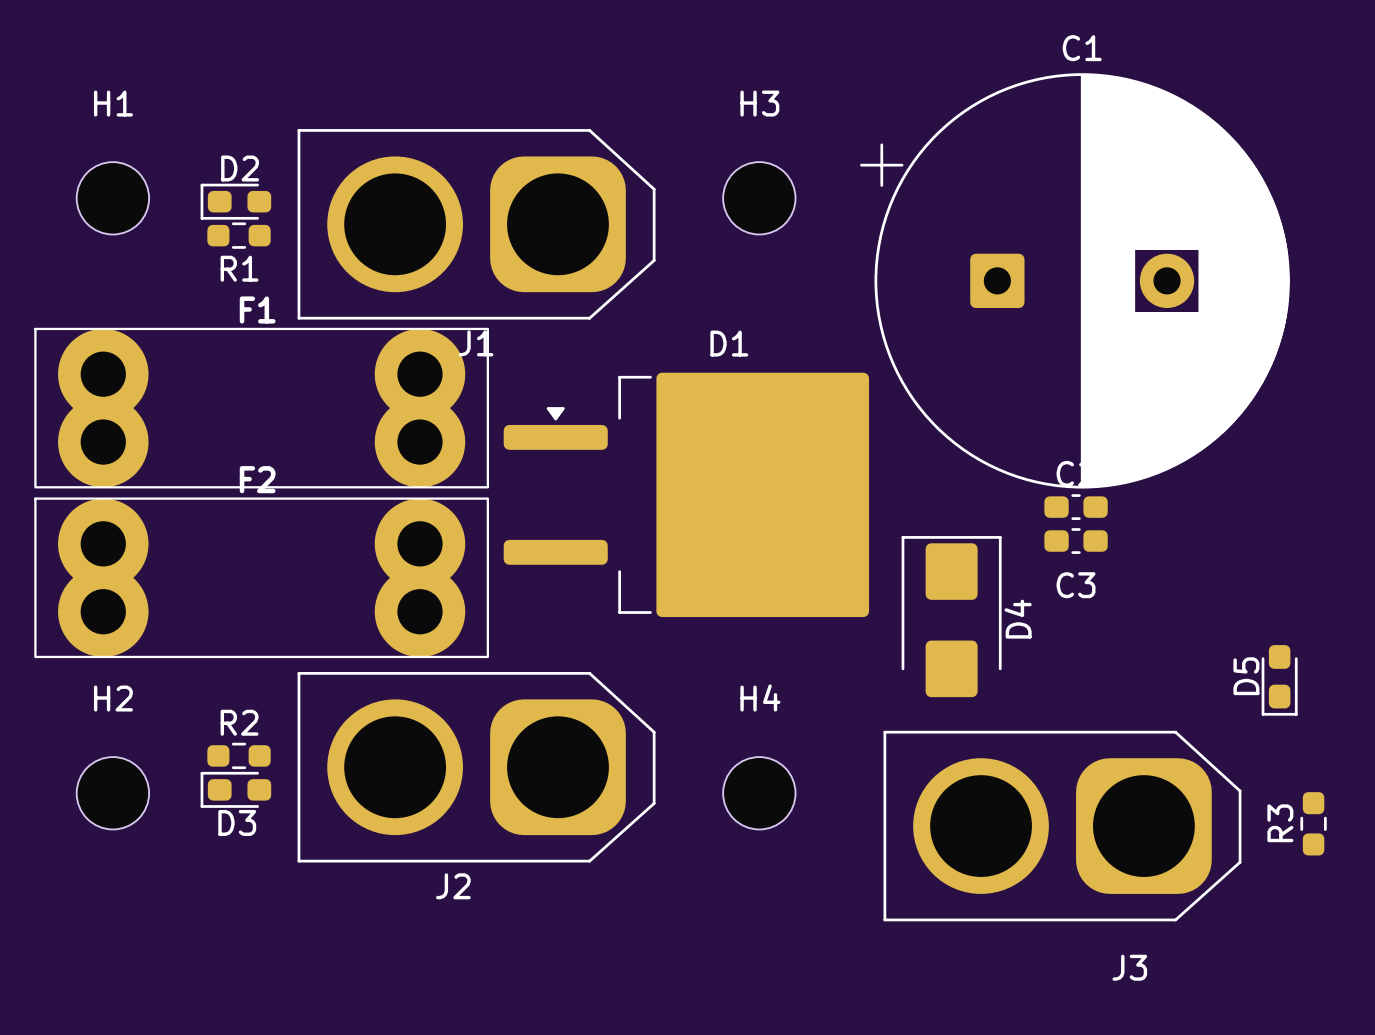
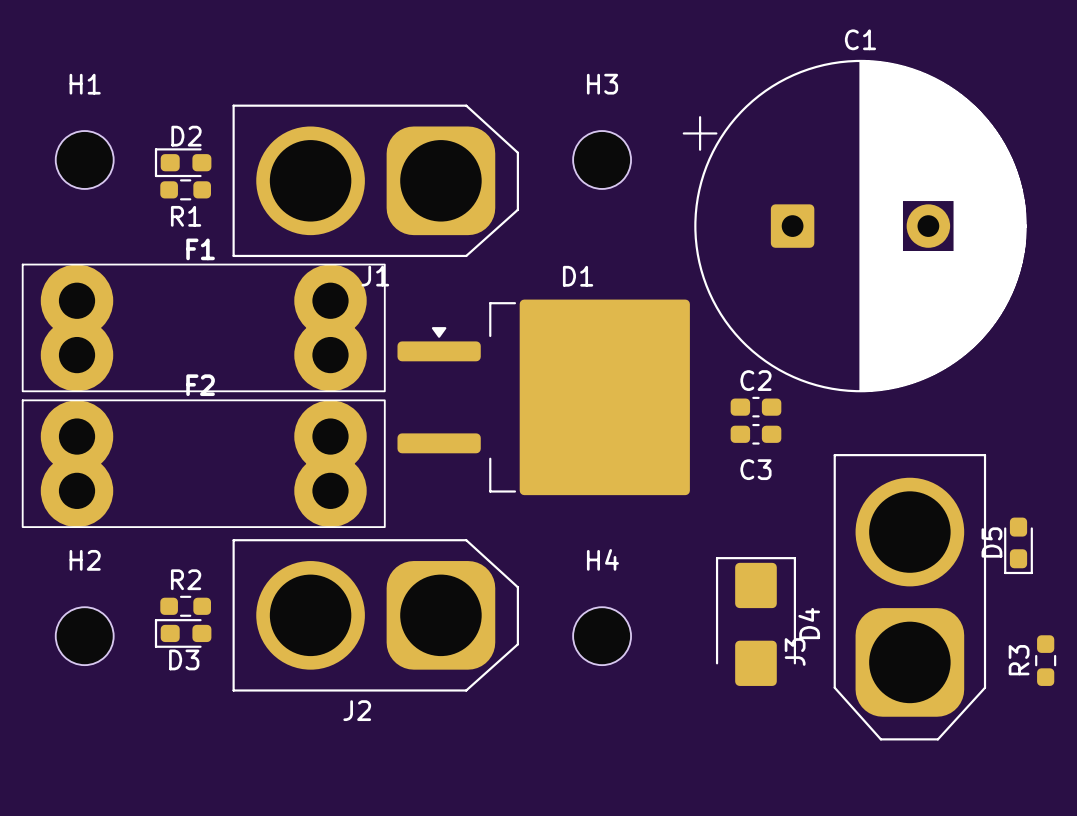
C2 position: (1076, 507) -> (755, 407)
C3 position: (1076, 541) -> (755, 434)
D4 position: (951, 616) -> (755, 621)
J3 rotation: 0° (1062, 826) -> 90° clockwise (909, 597)

